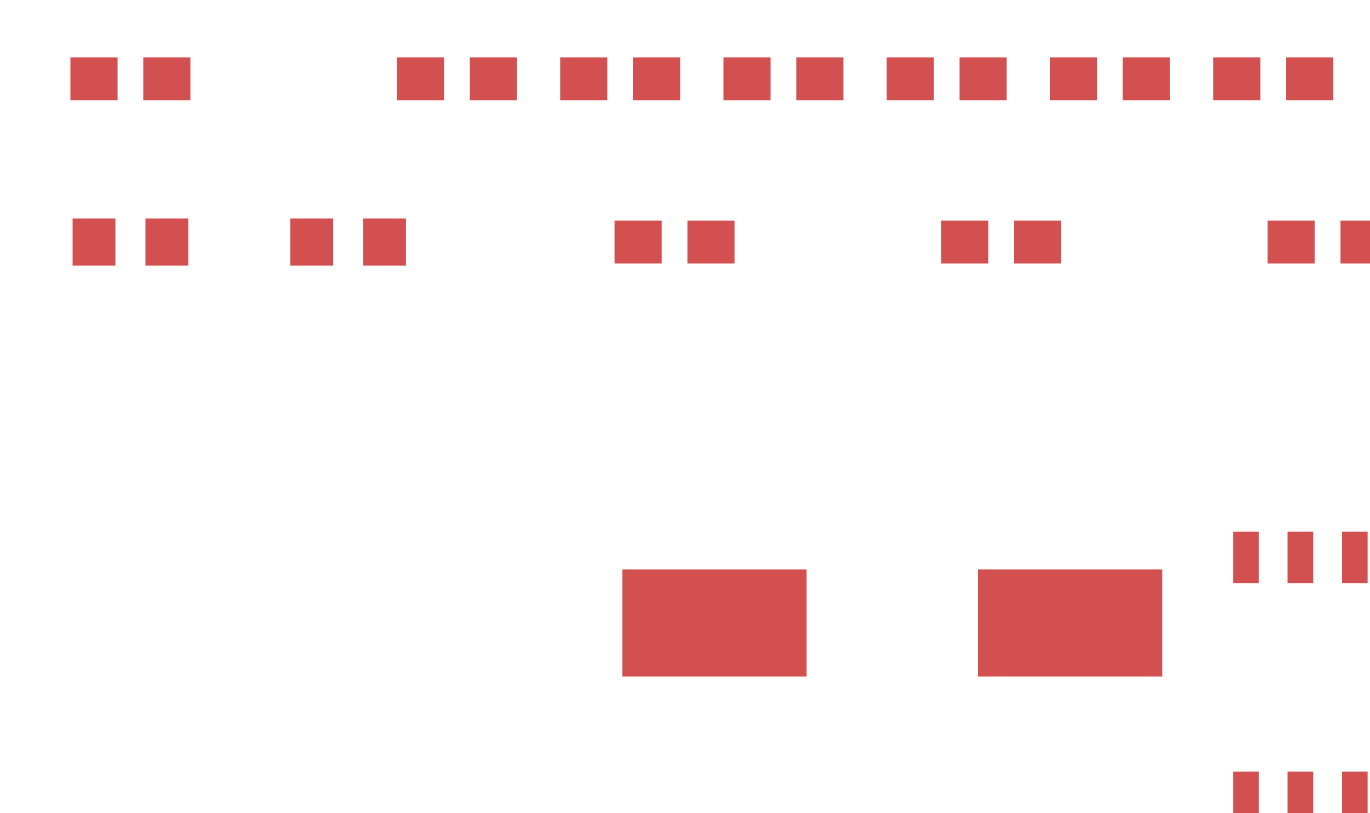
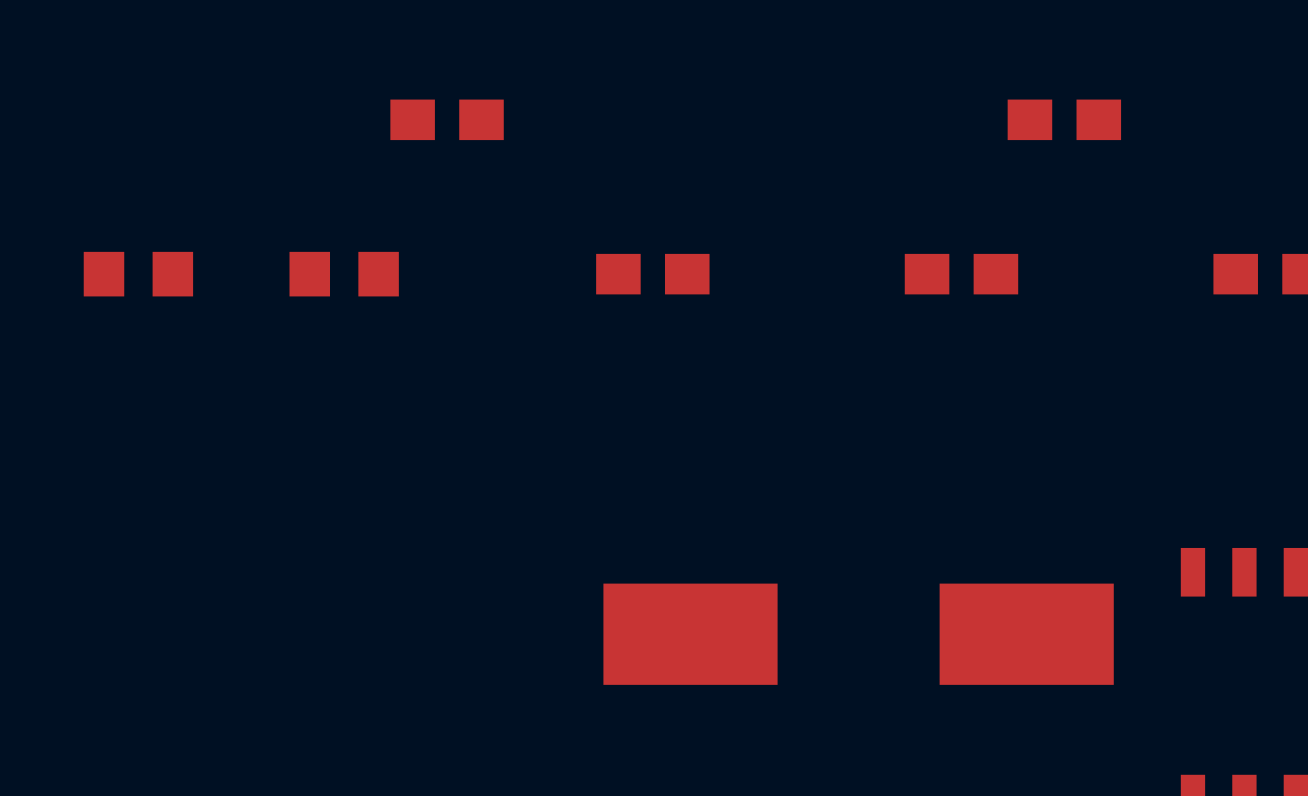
part: (130, 78) -> none
part: (620, 78) -> none
part: (783, 78) -> none
part: (946, 78) -> none
part: (1273, 78) -> none

